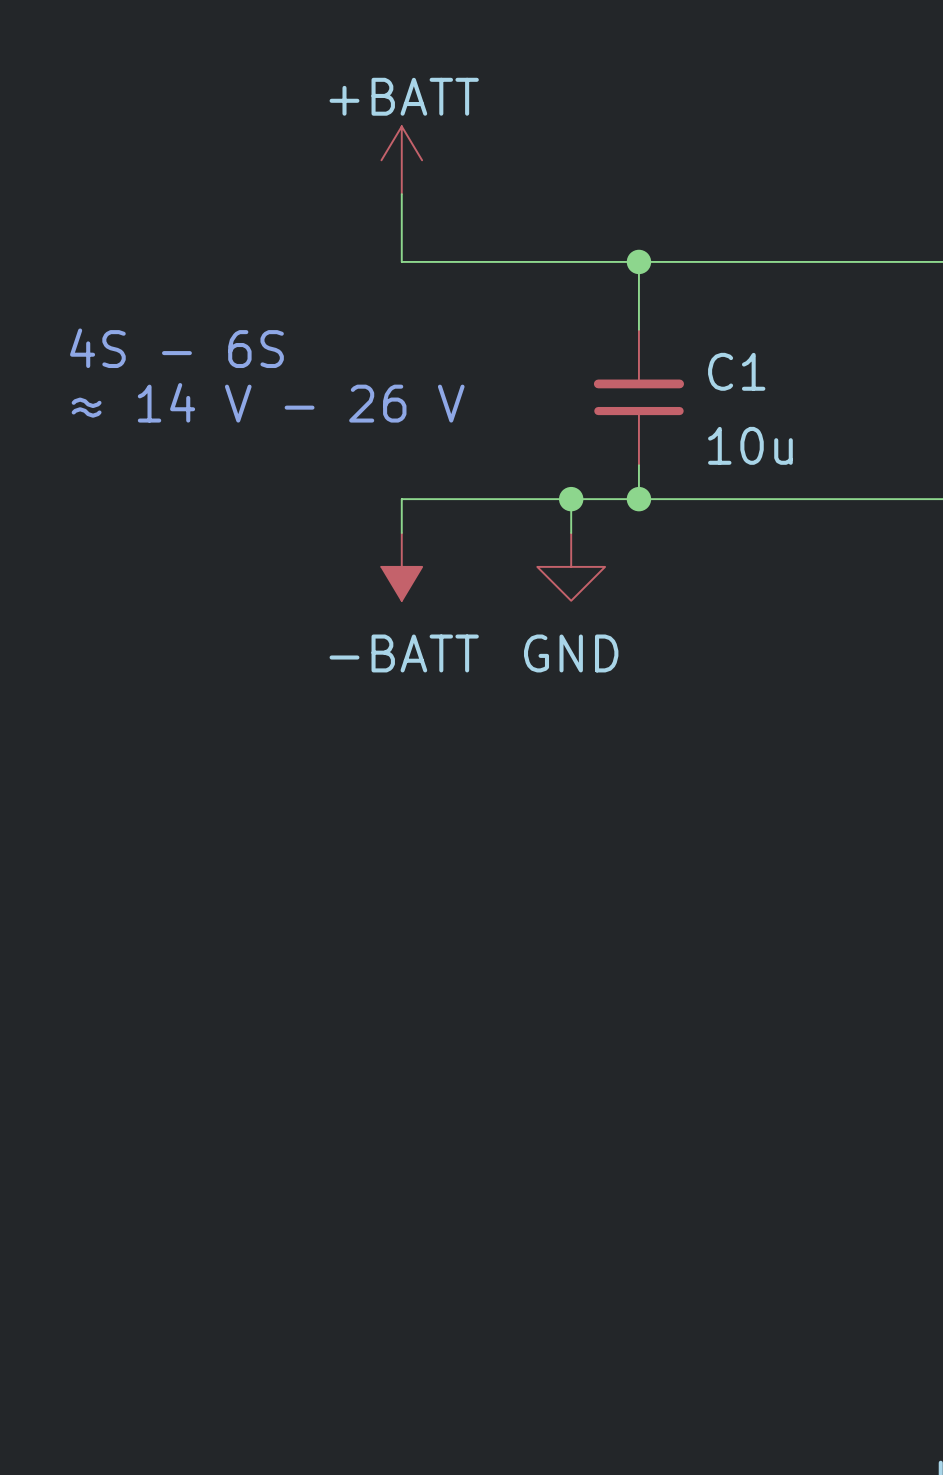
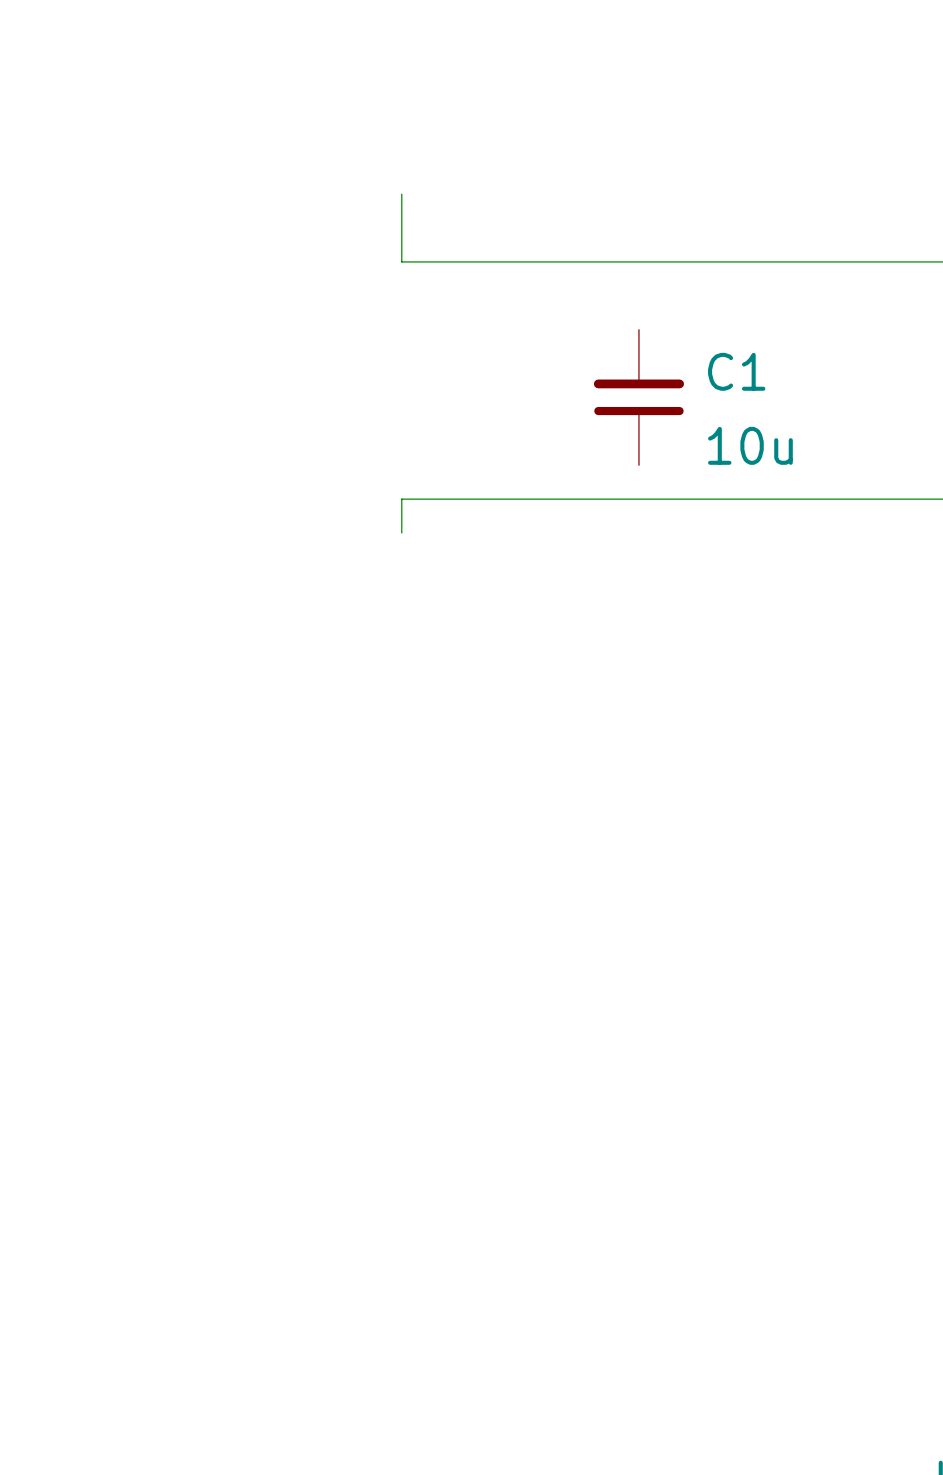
power symbol: +BATT (401, 160) -> none
wire: (638, 261) (638, 329) -> none
junction: (638, 261) -> none
text: 4S - 6S (176, 348) -> none
text: ≈ 14 V - 26 V (268, 402) -> none
wire: (638, 465) (638, 499) -> none
wire: (571, 499) (571, 533) -> none
junction: (571, 499) -> none
junction: (638, 499) -> none
power symbol: -BATT (401, 566) -> none
power symbol: GND (571, 566) -> none

